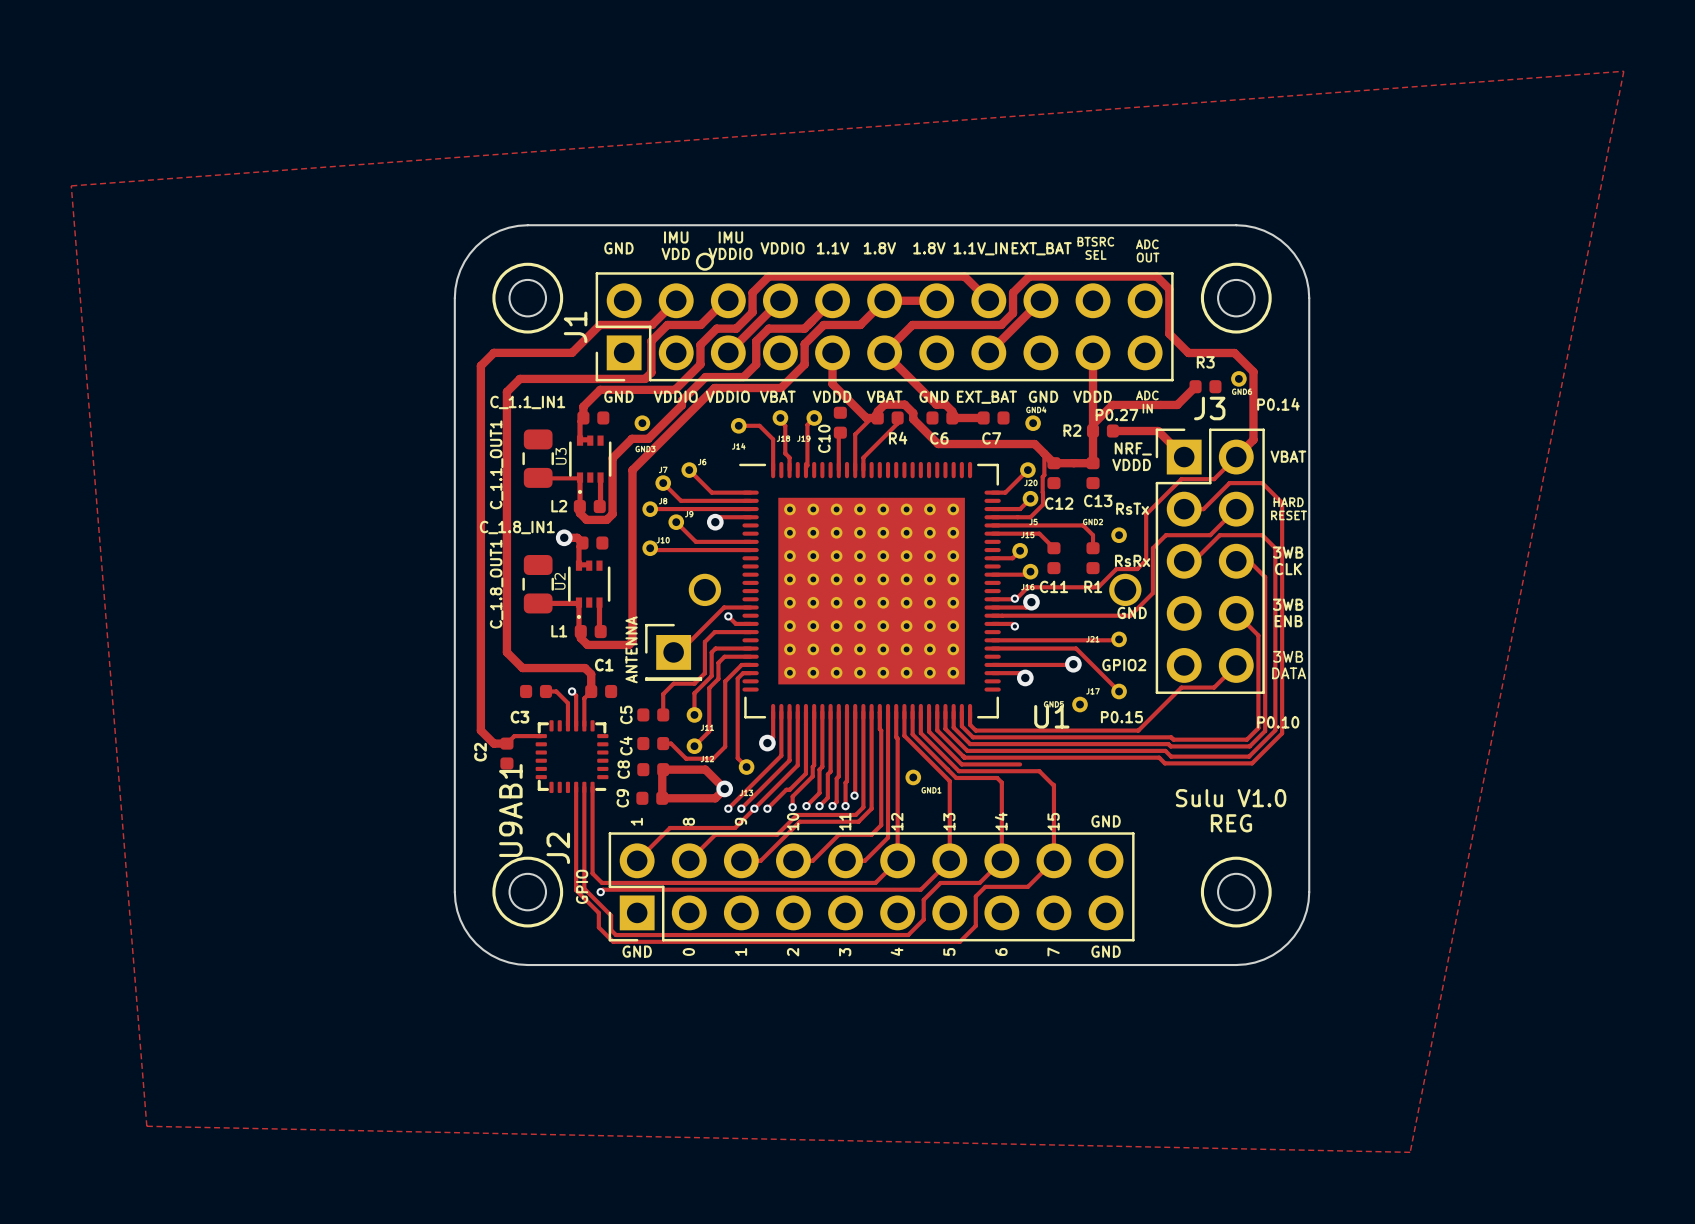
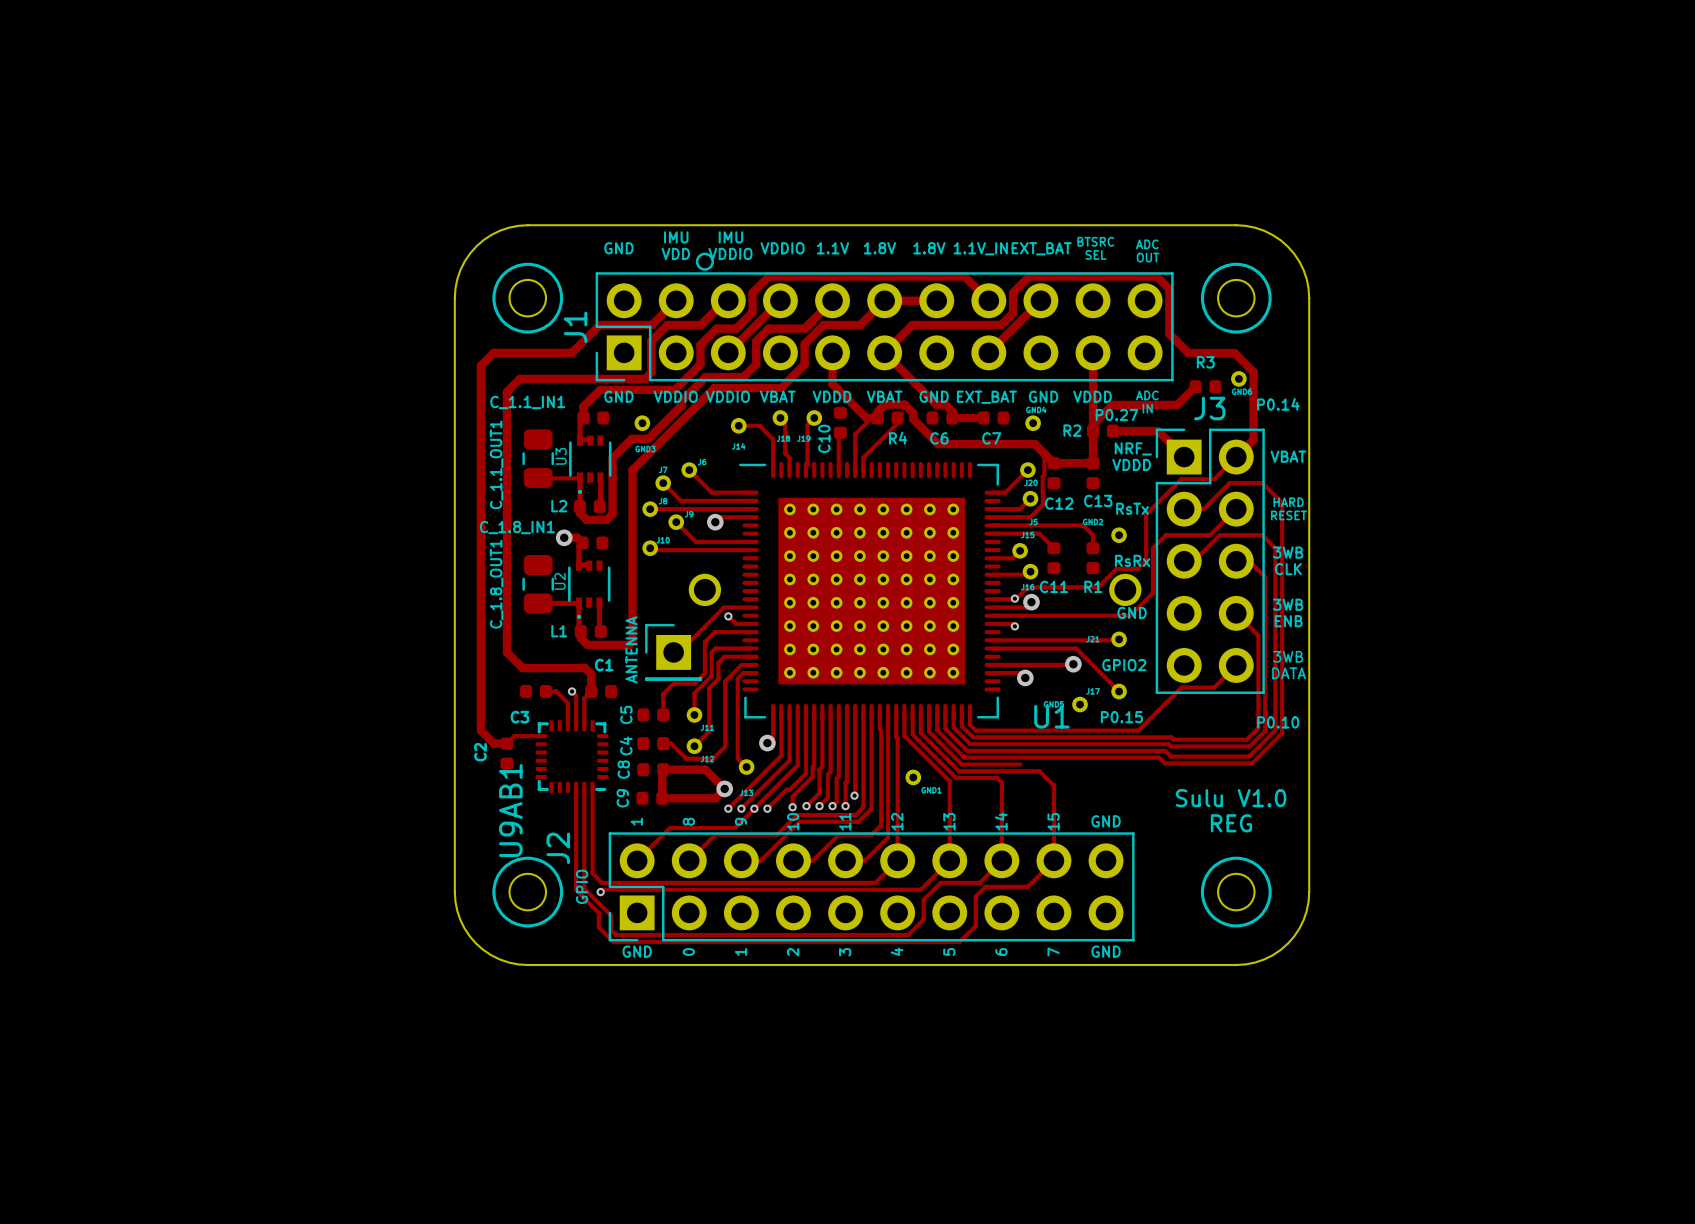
zone outline: (1623, 71) (71, 185) (146, 1126) (1410, 1152) (1623, 71) -> none

